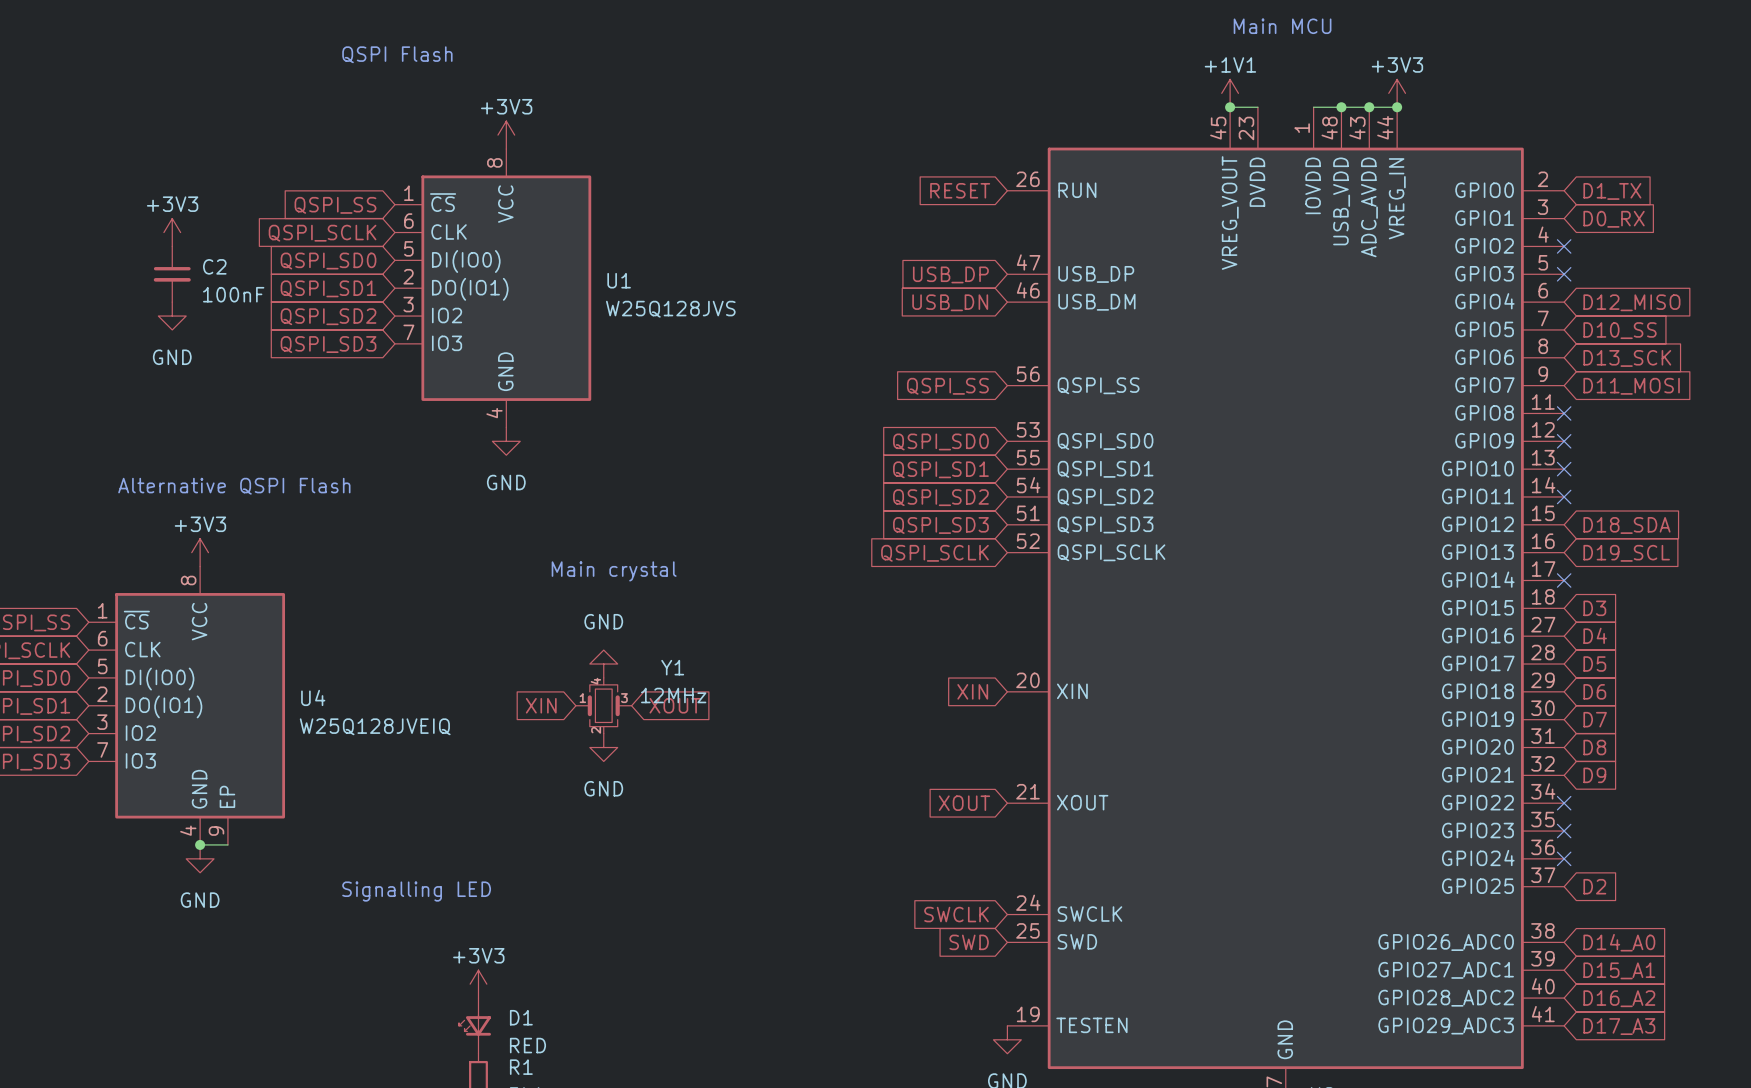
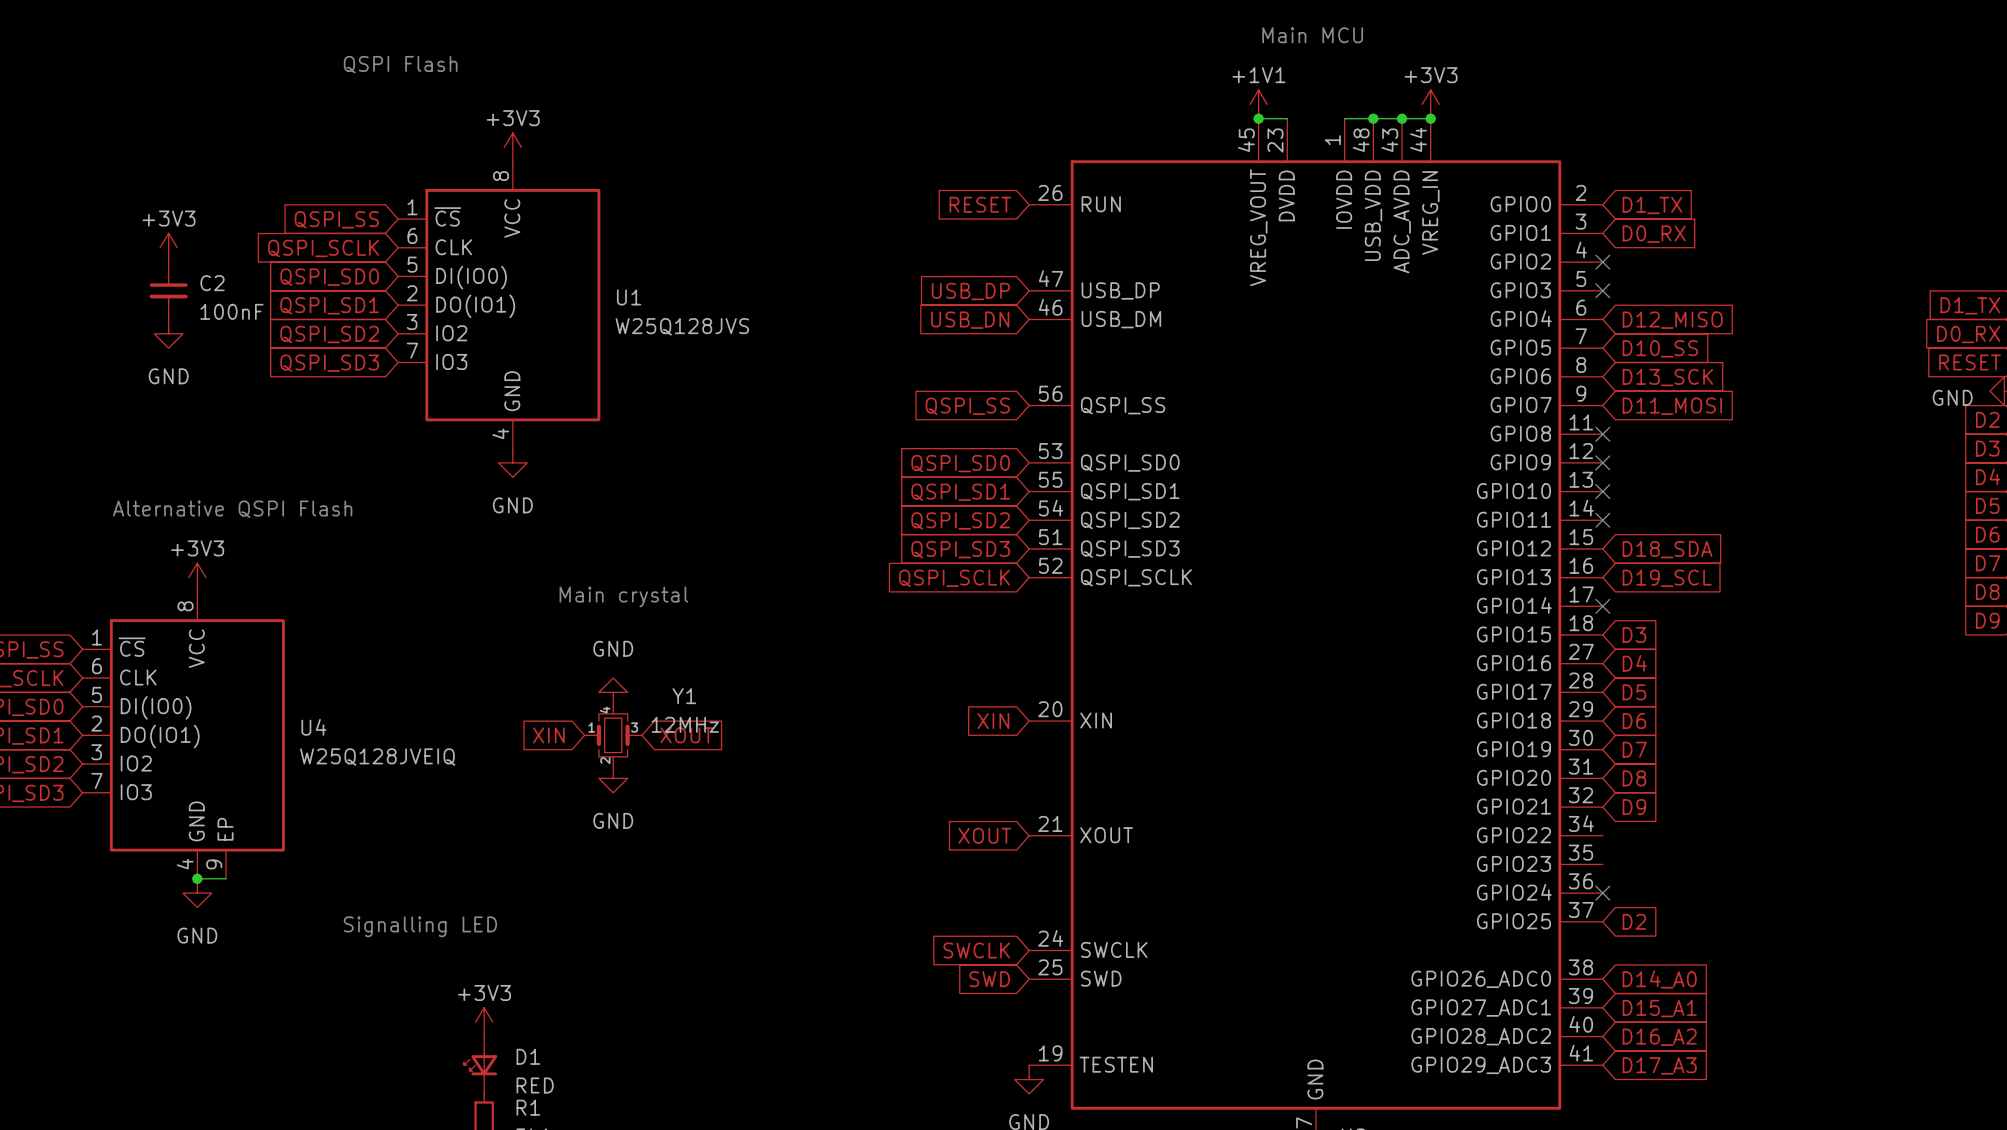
no-connect mark: (1564, 803) -> none
no-connect mark: (1564, 831) -> none

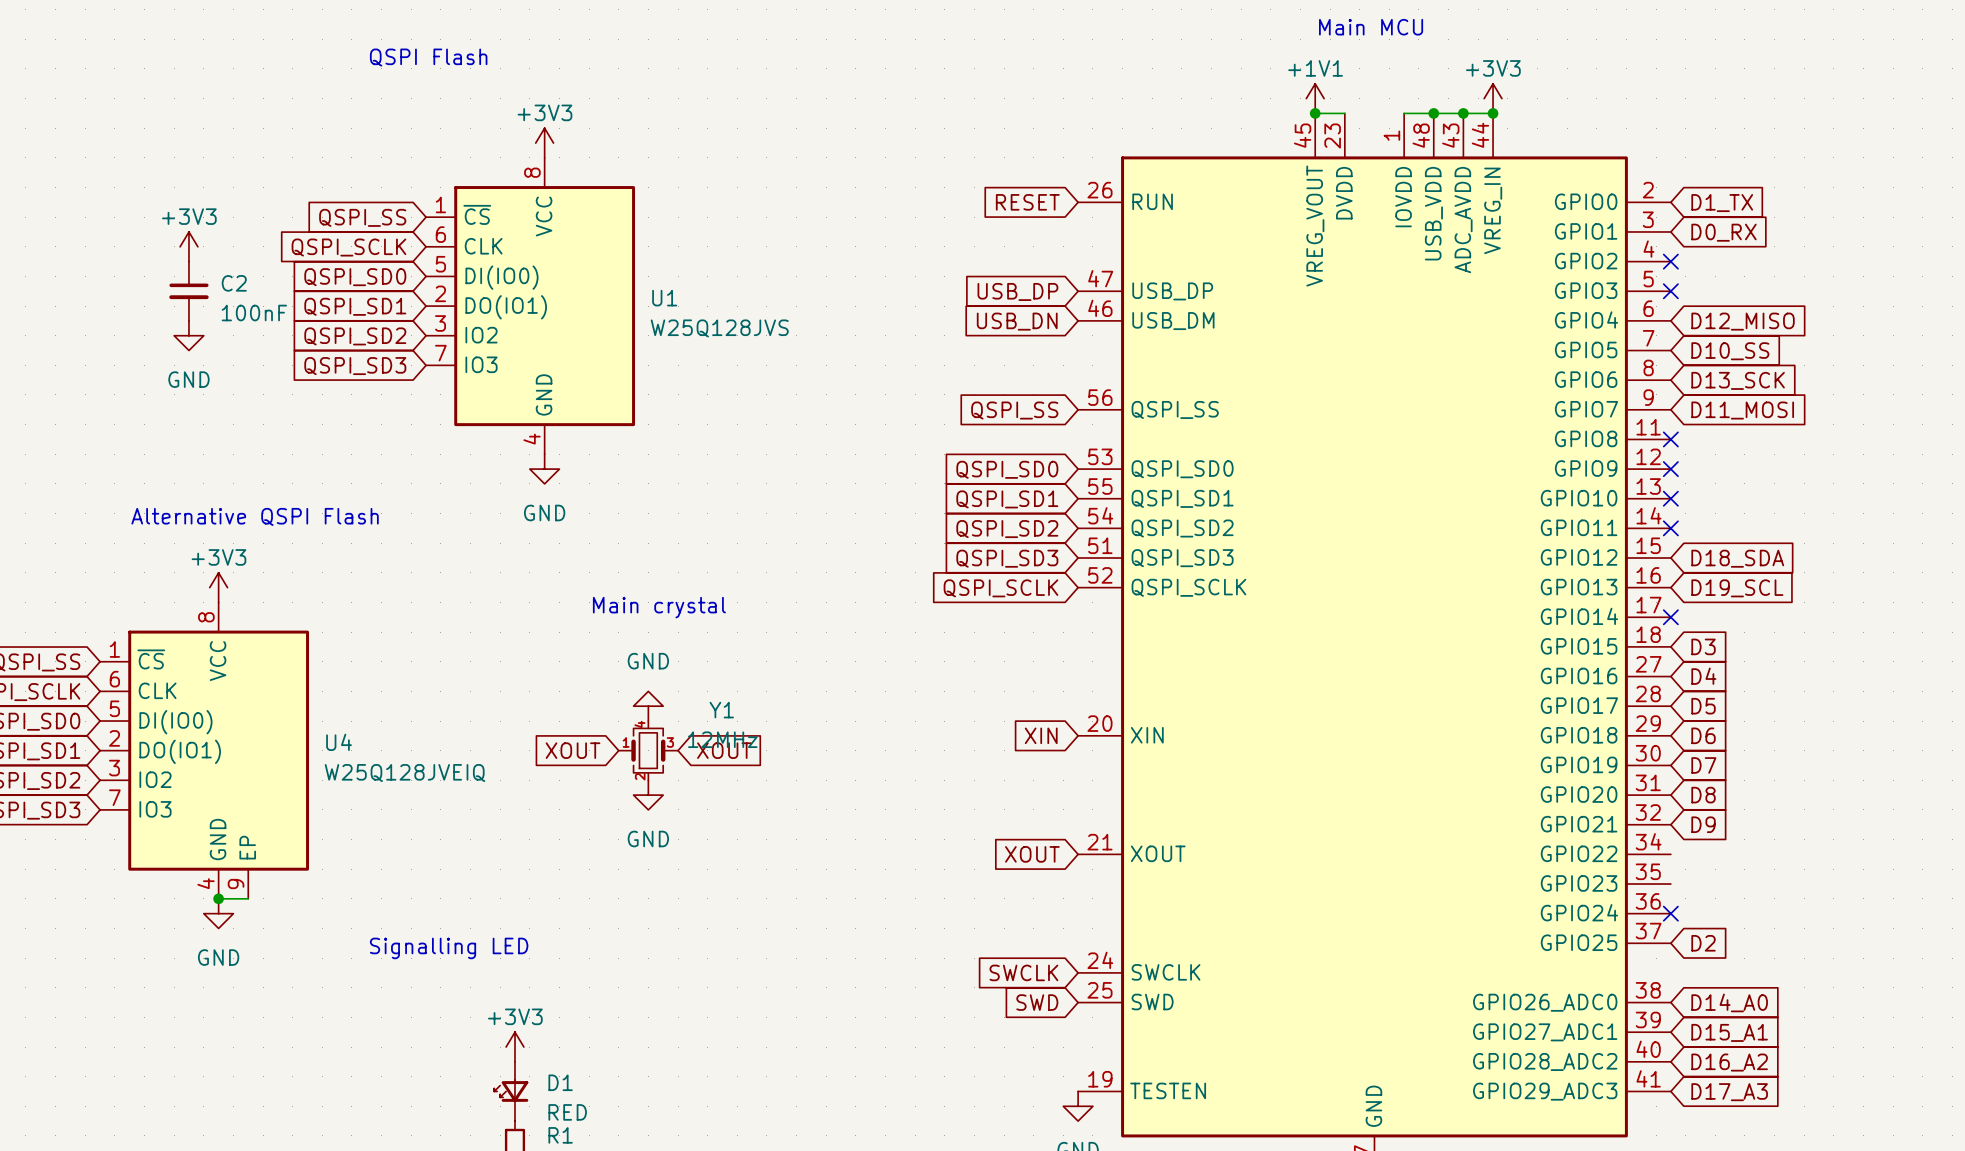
global label: XIN (548, 735) -> XOUT (573, 750)

